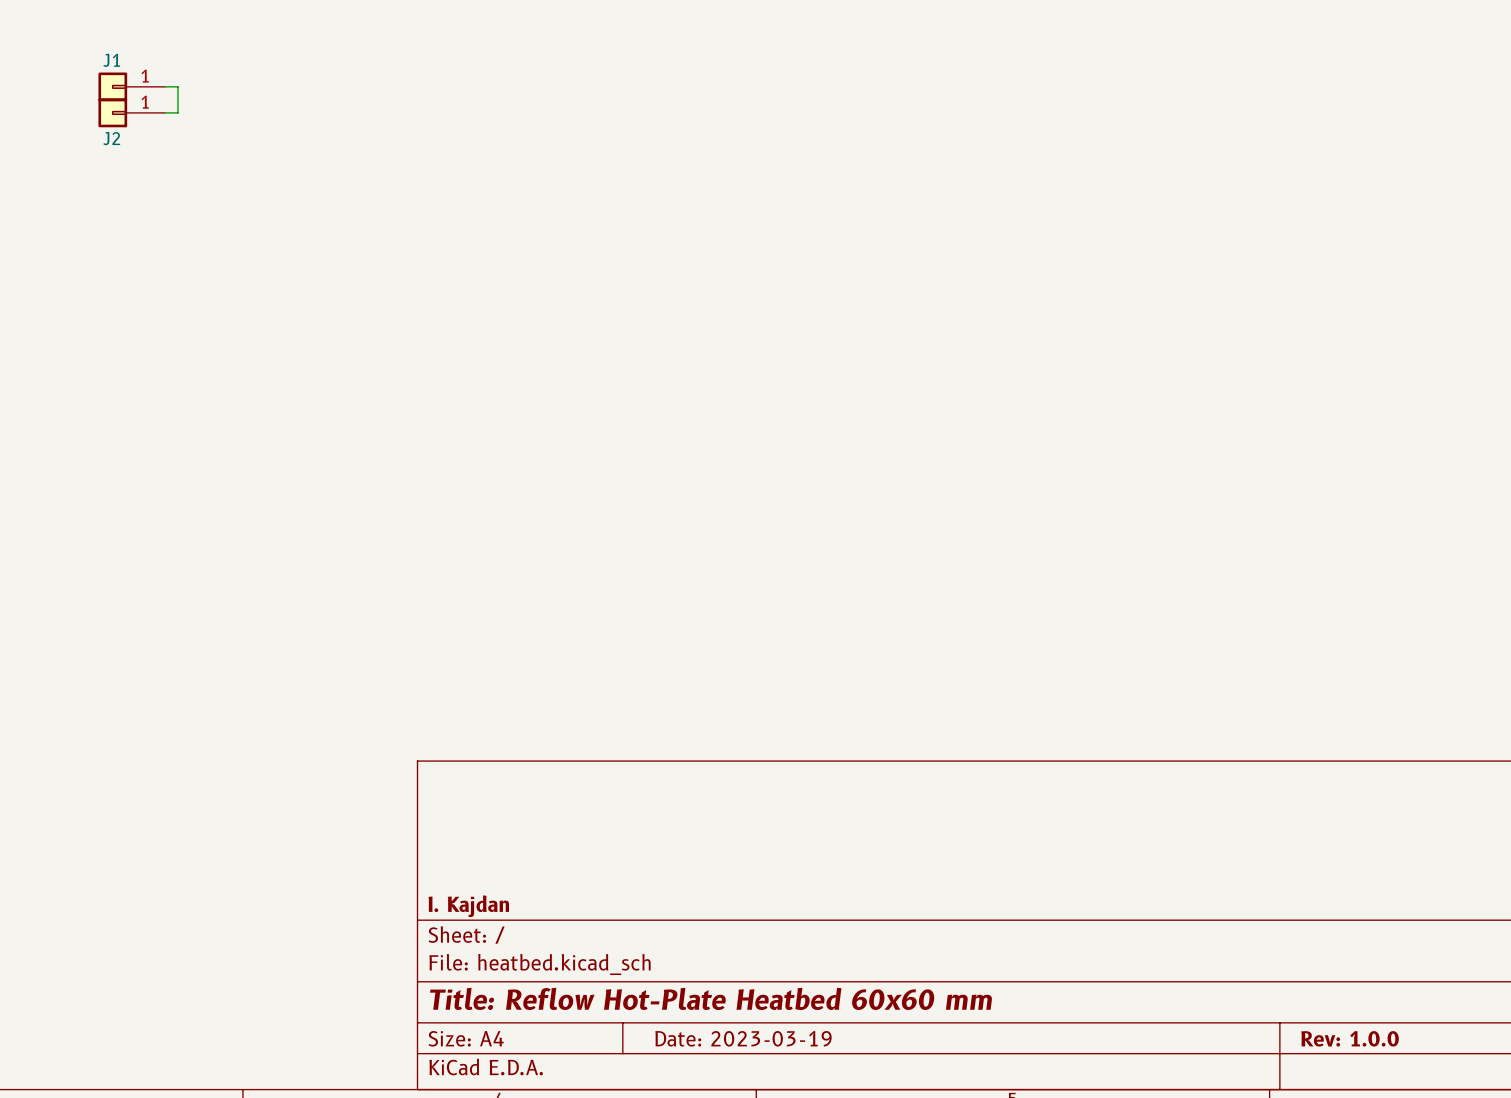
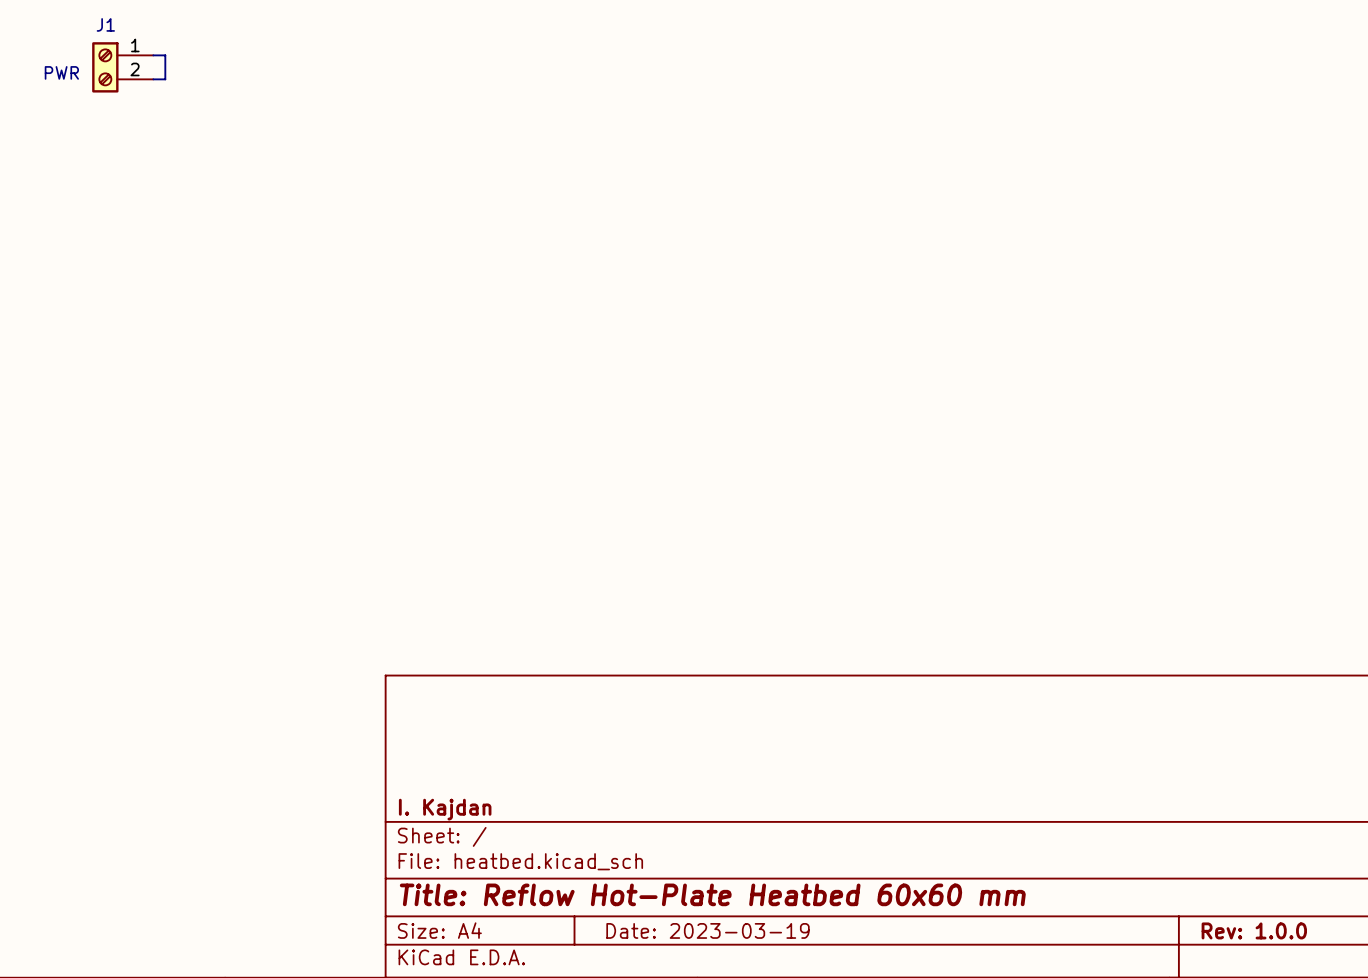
J1 symbol: [98, 72, 165, 102] -> [92, 42, 154, 93]
J1 value: none -> PWR (61, 72)
J2: (131, 112) -> none

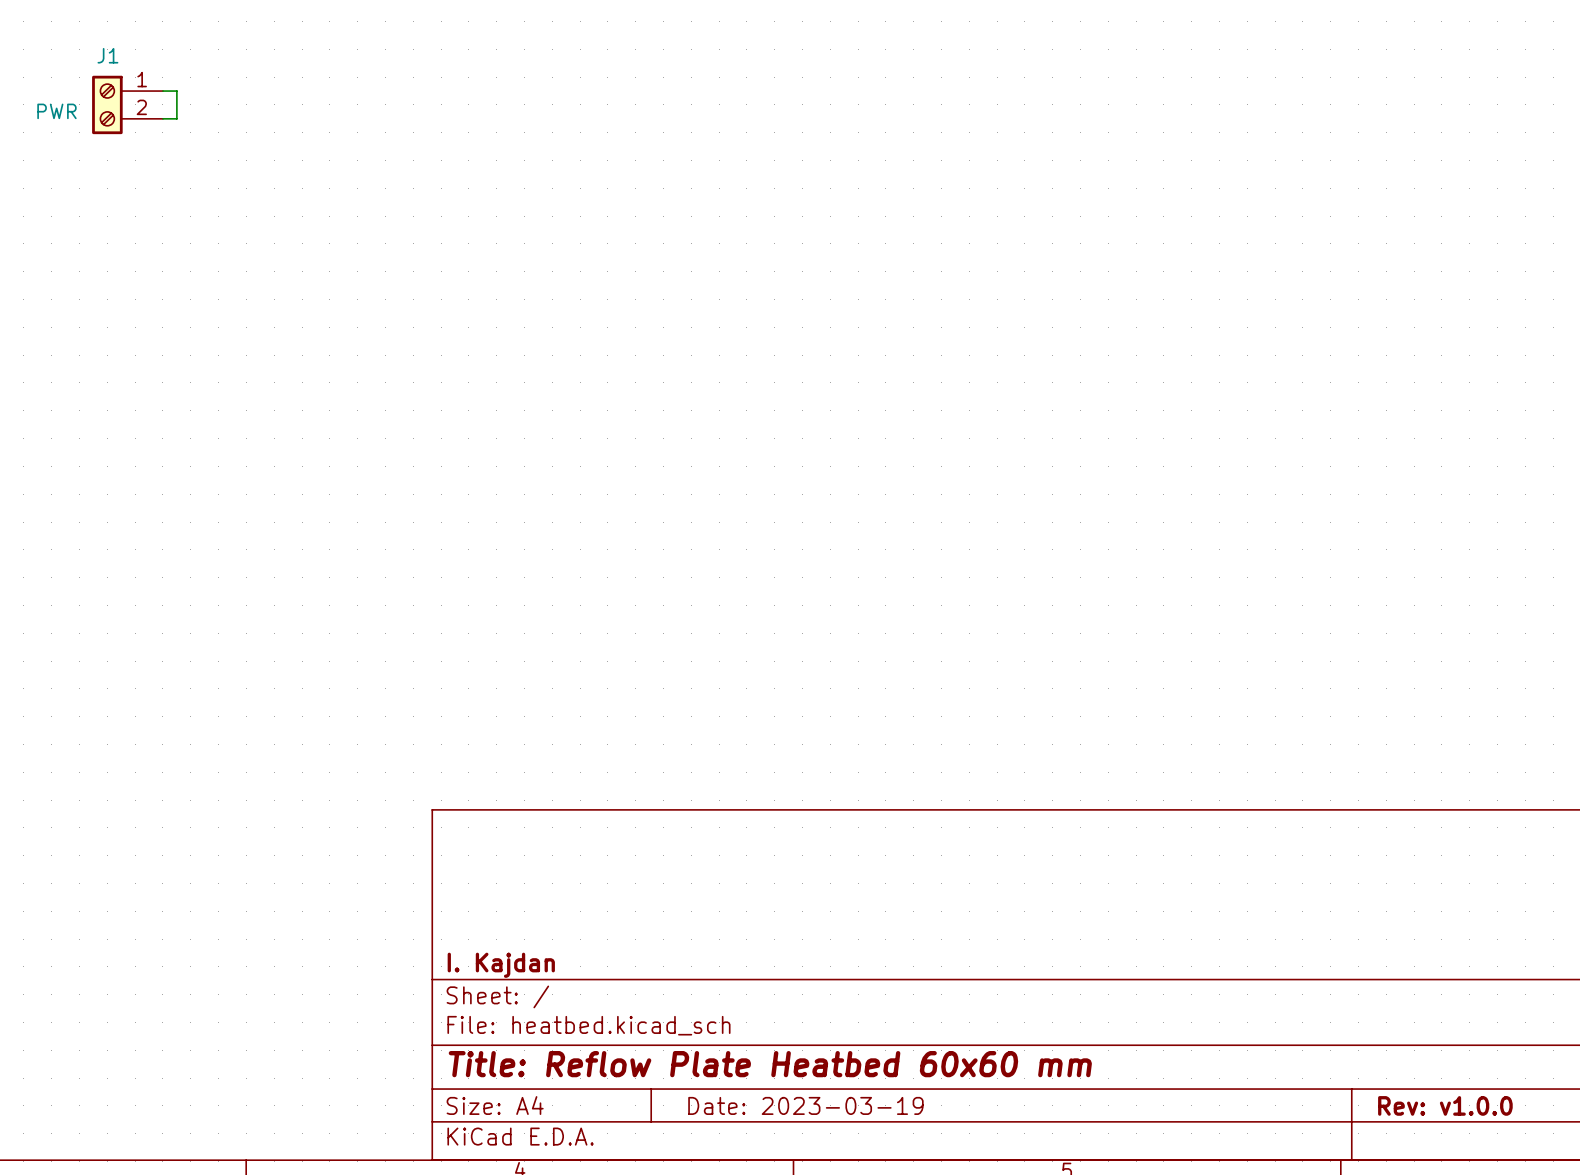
title block: Title: Reflow Hot-Plate Heatbed 60x60 mm (712, 894) -> Title: Reflow Plate Heatbed 60x60 mm (770, 1064)
title block: Rev: 1.0.0 (1254, 930) -> Rev: v1.0.0 (1445, 1105)

